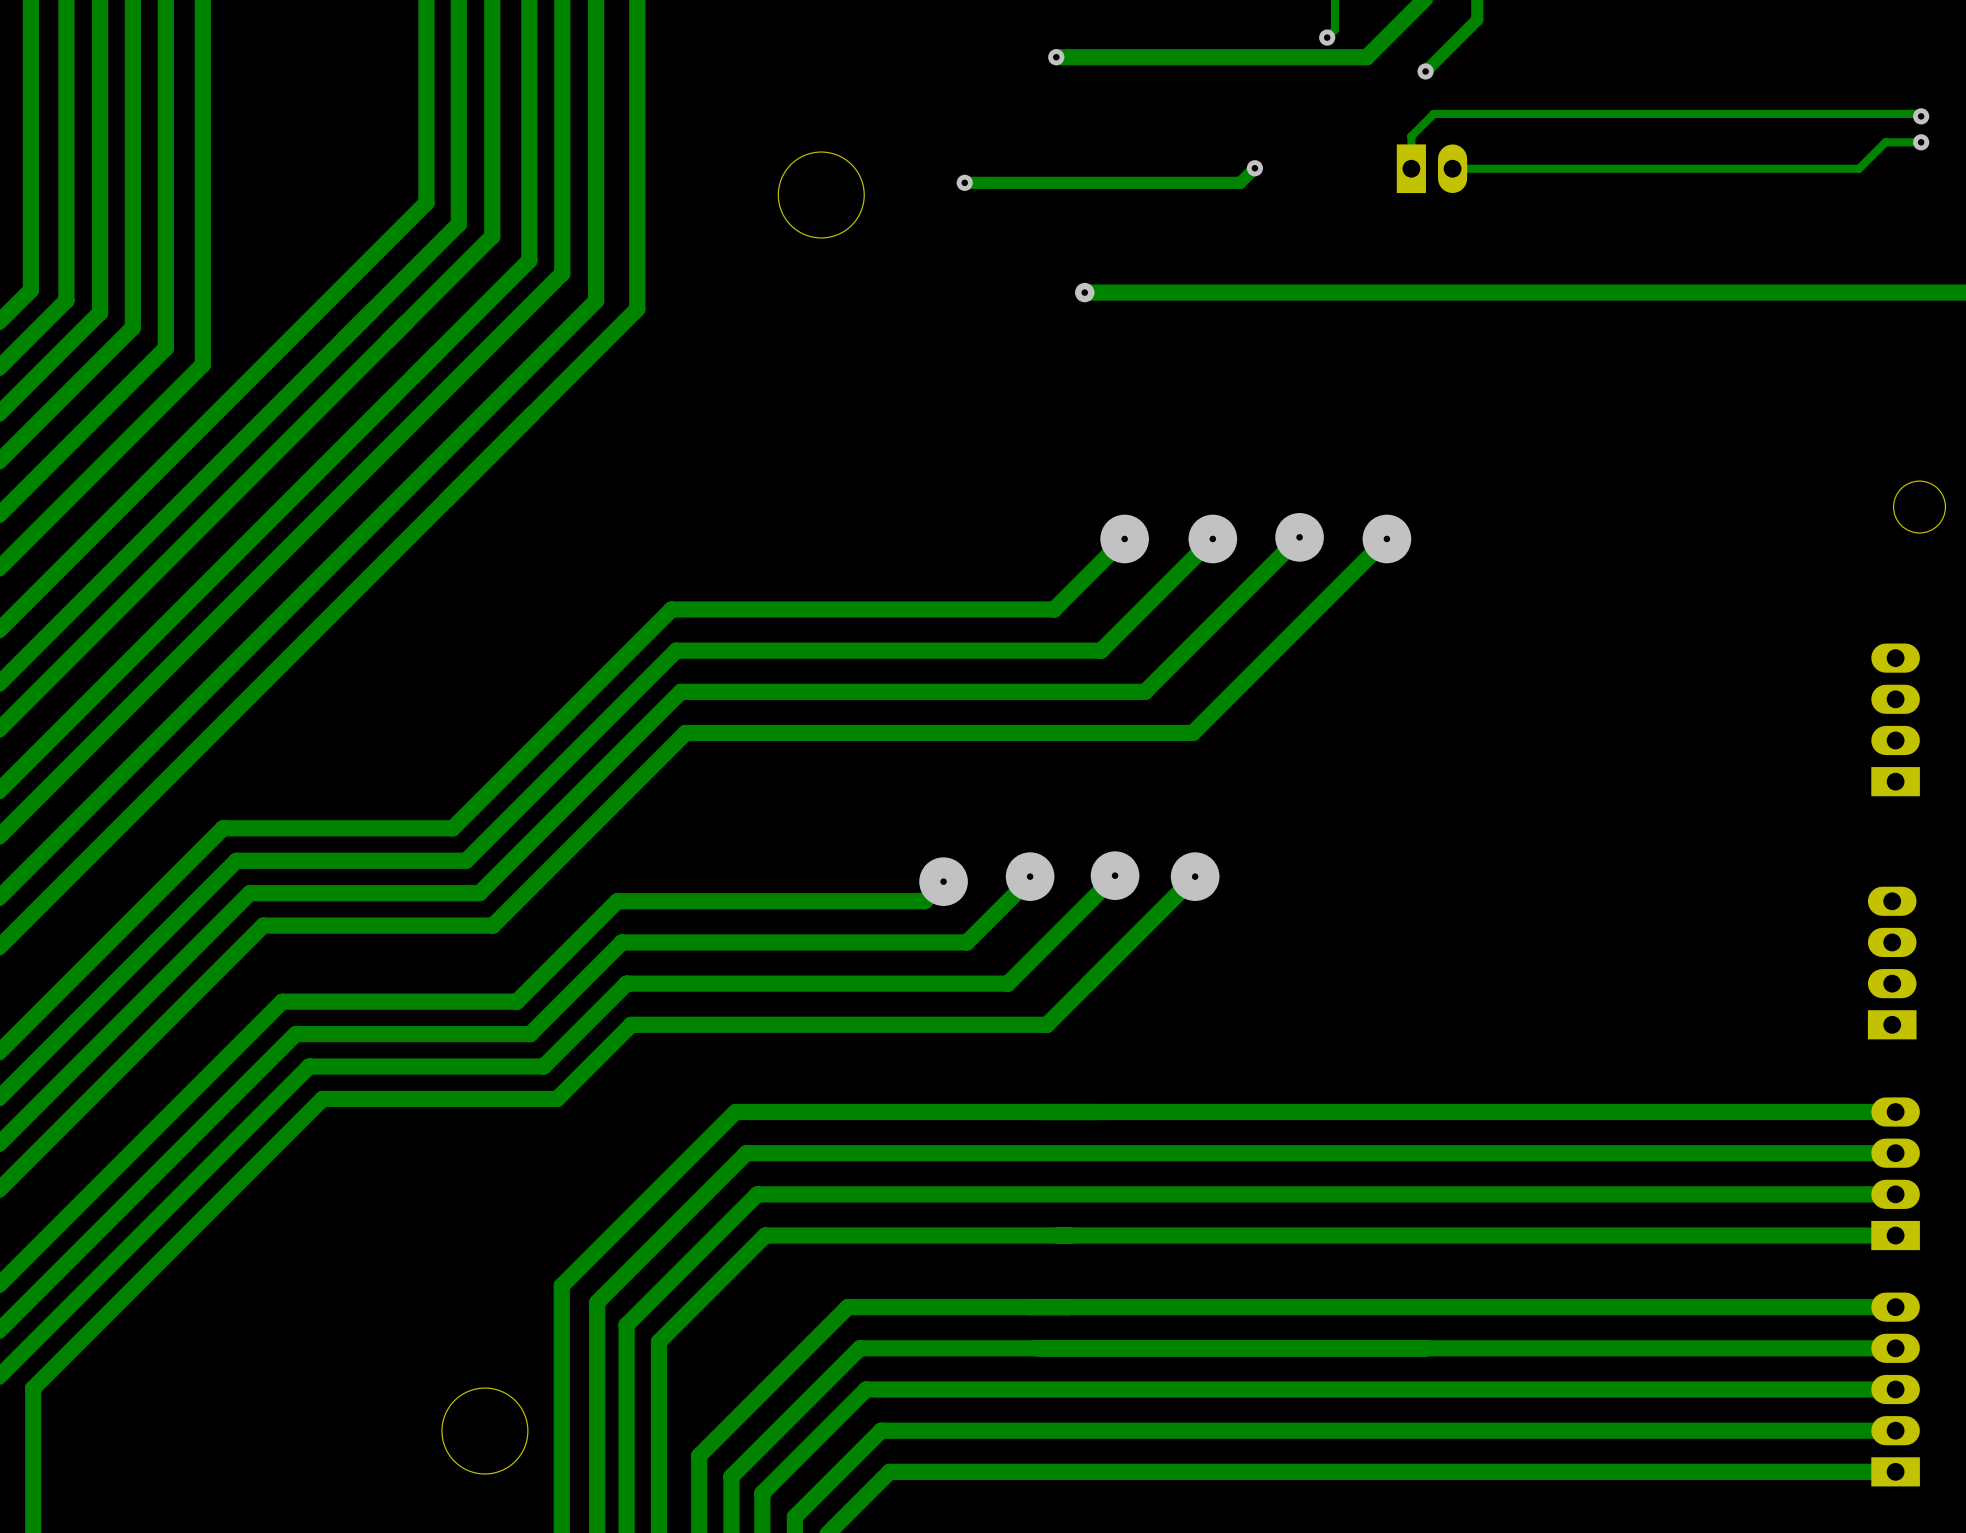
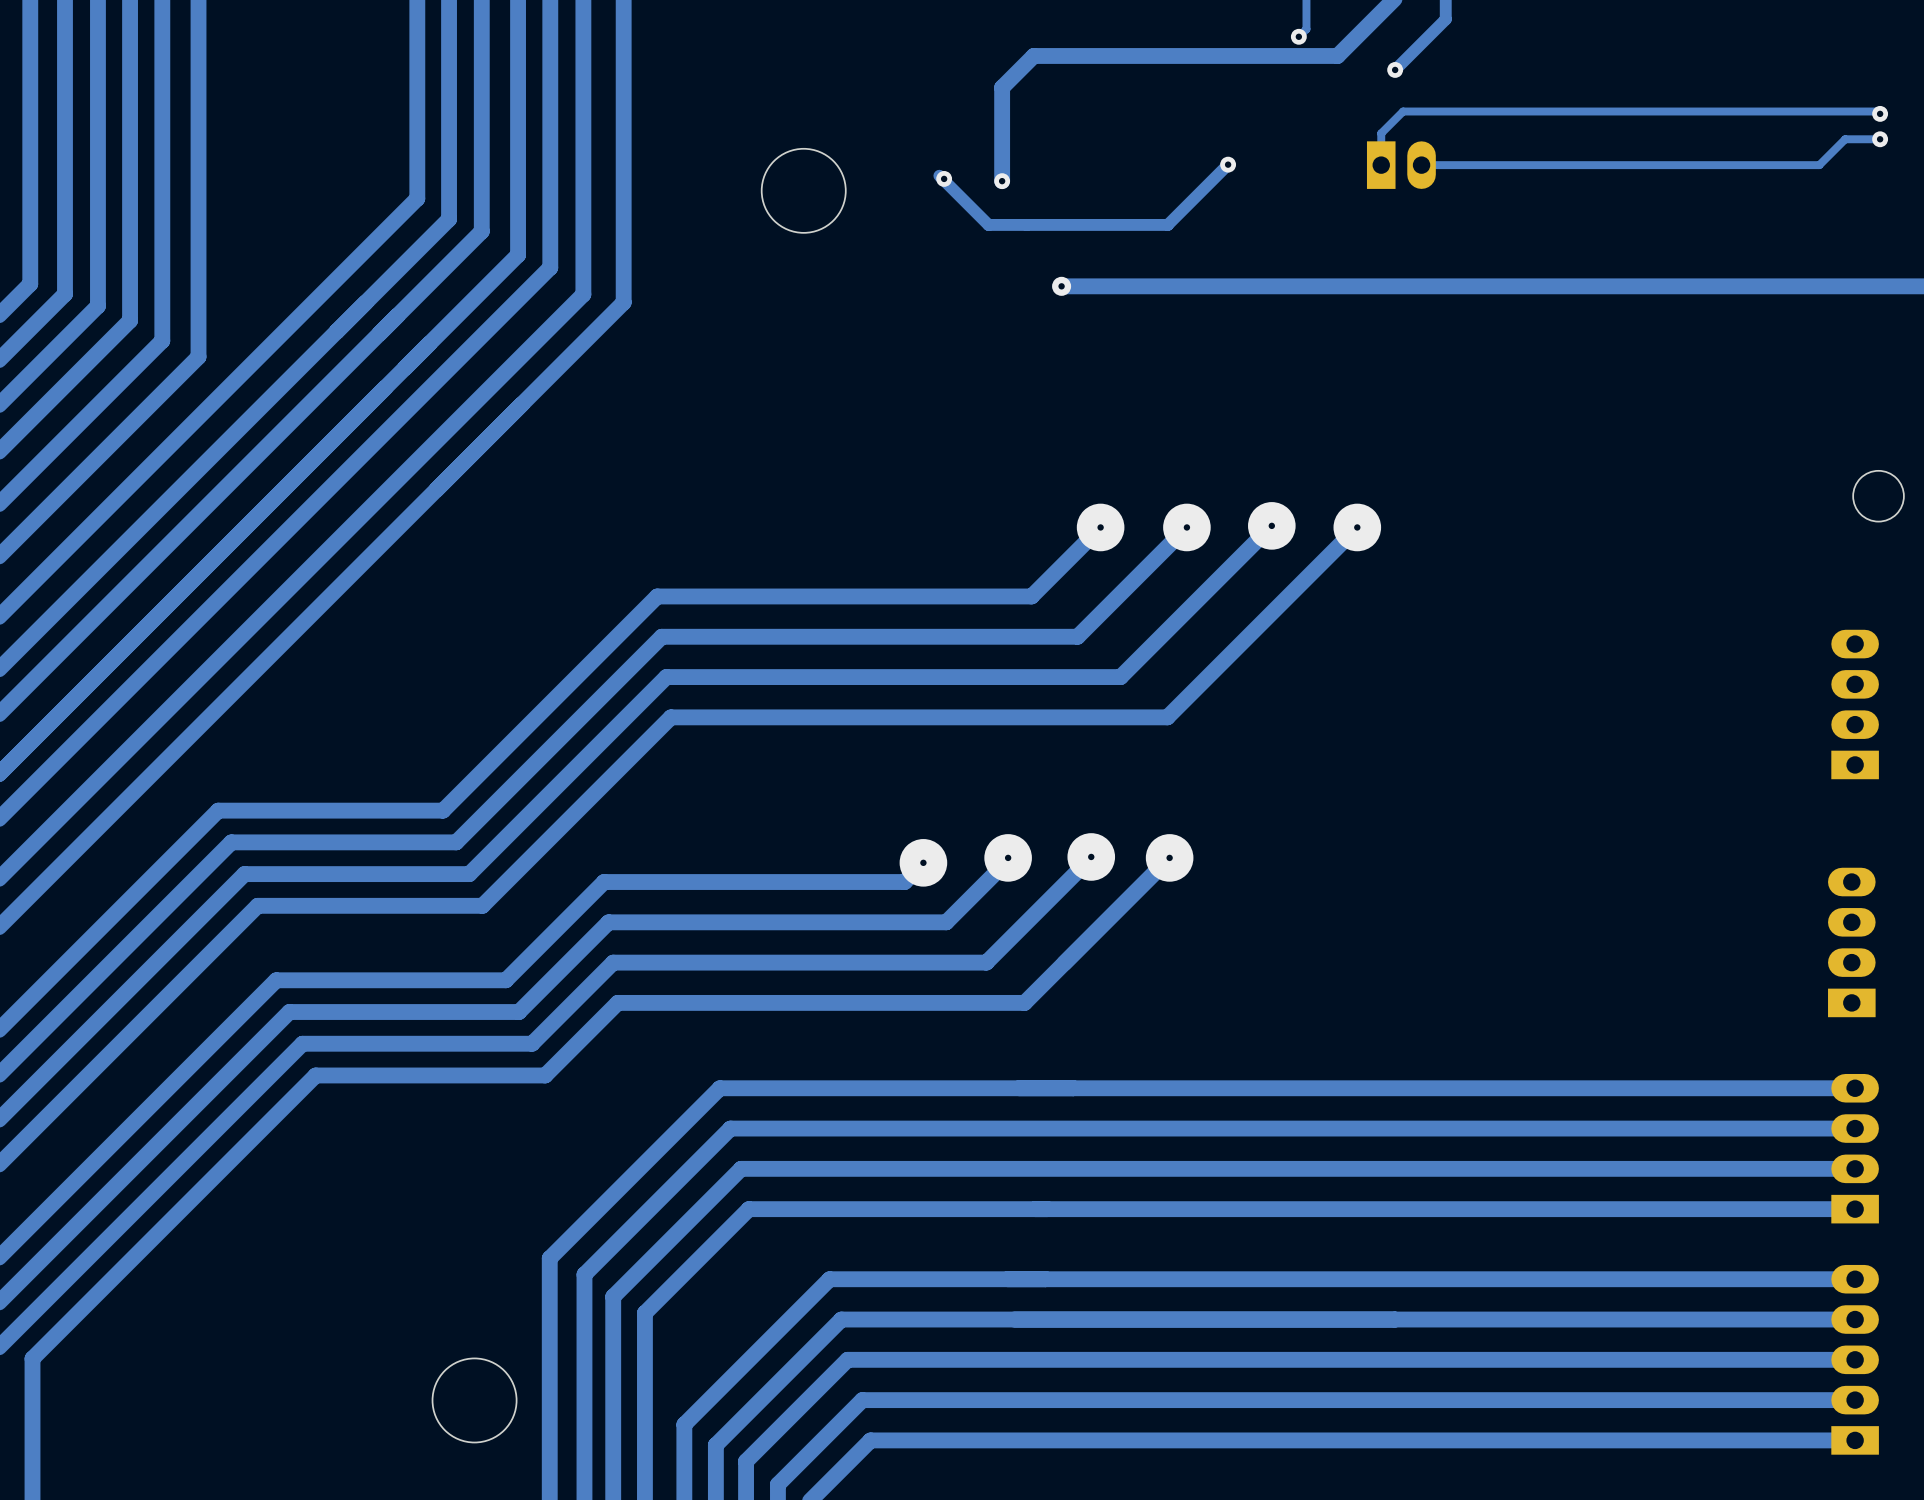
track: none -> (1033, 55) (1002, 87) (1002, 181)
via: (1056, 57) -> none
track: (1240, 182) (964, 182) -> (1213, 178) (1167, 224) (988, 224) (939, 175)
via: none -> (1002, 181)

